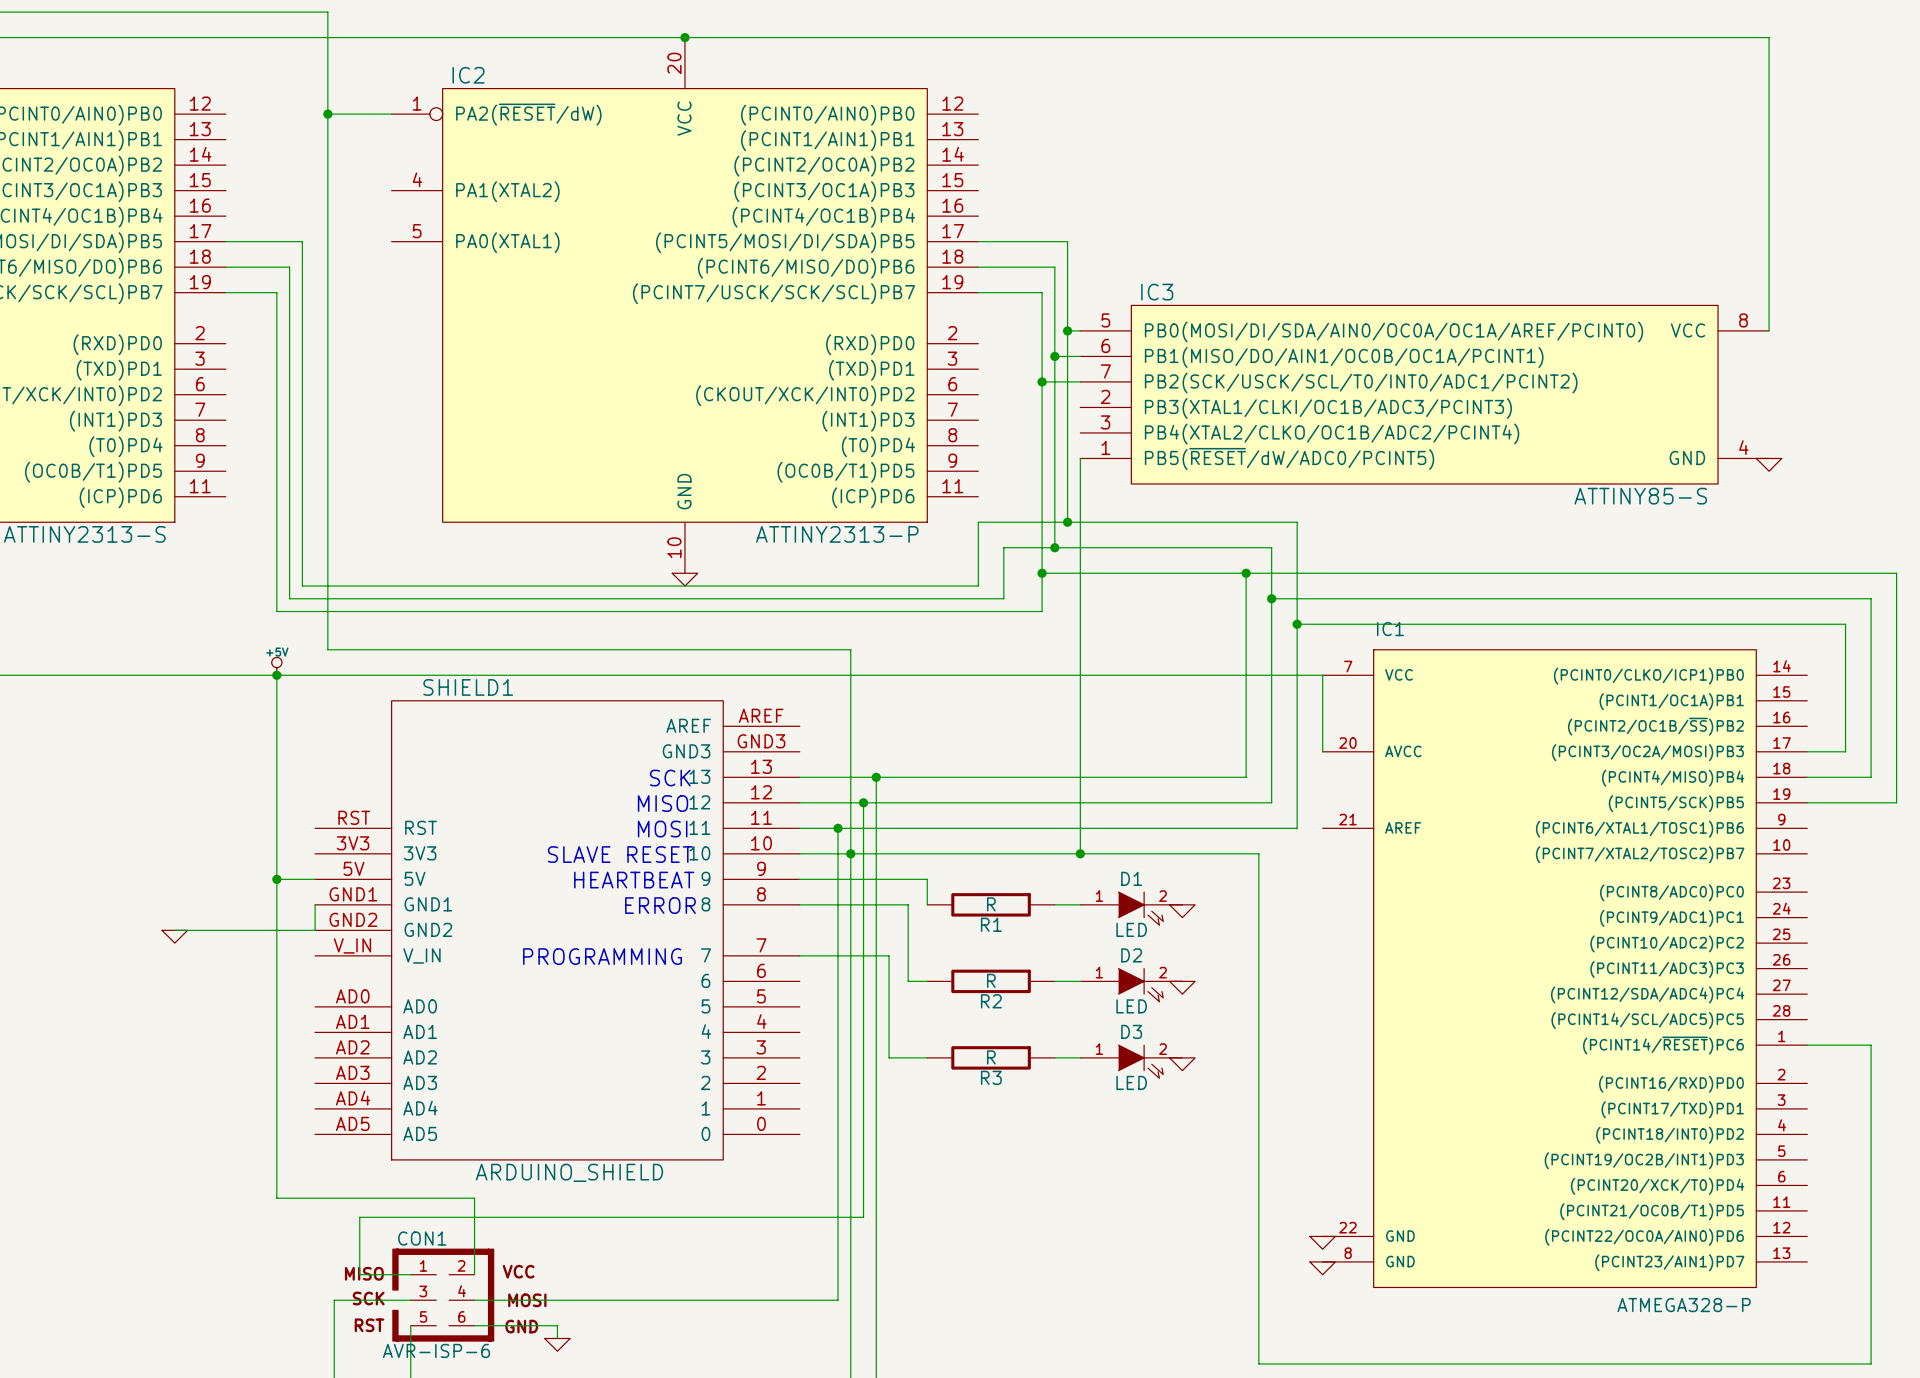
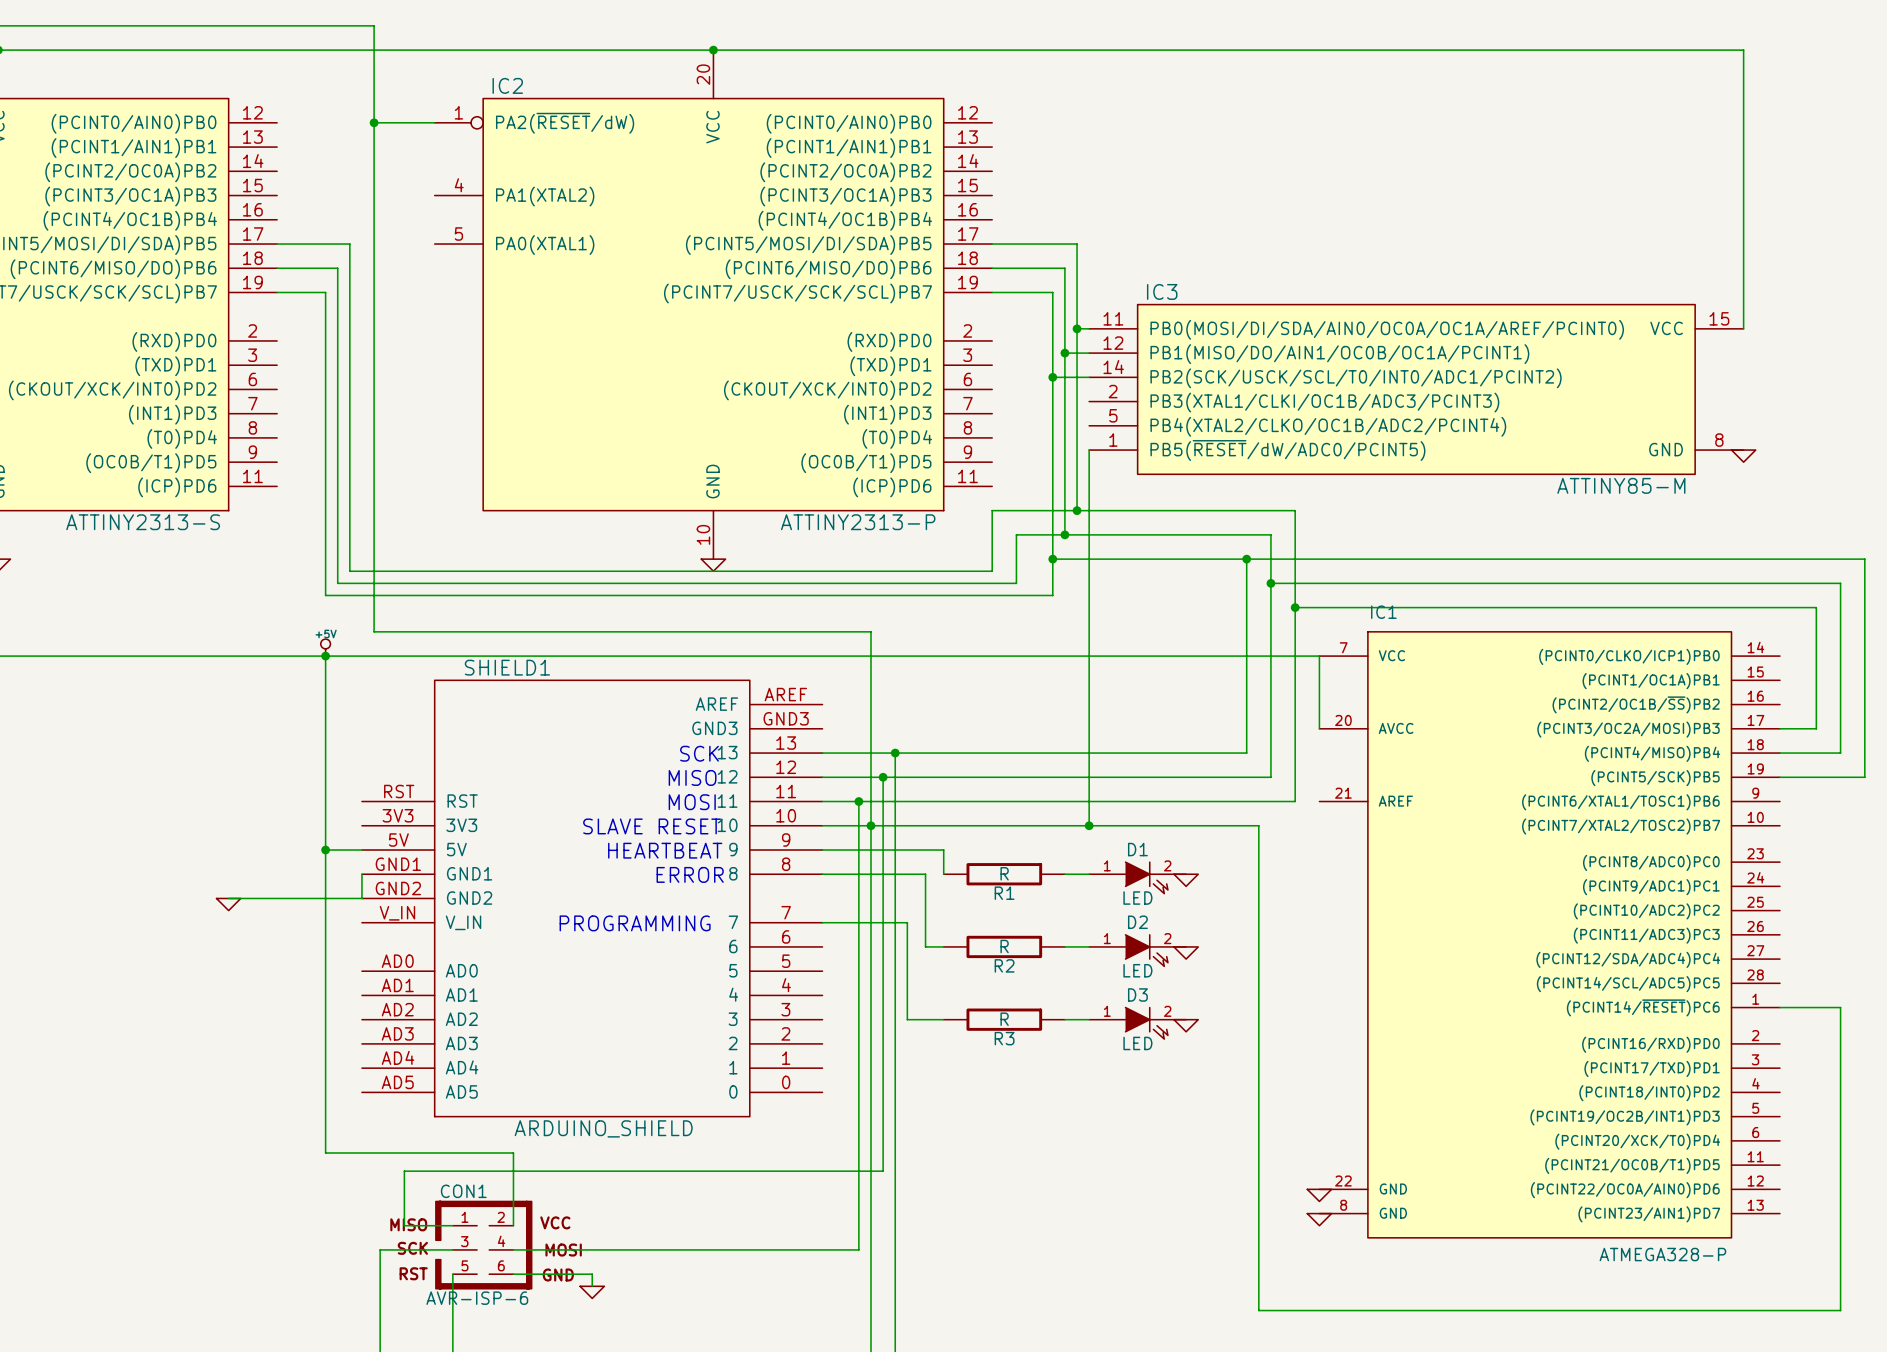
IC3 pin number: 5 (1105, 320) -> 11 (1113, 318)
IC3 pin number: 8 (1743, 320) -> 15 (1719, 318)
IC3 pin number: 6 (1105, 345) -> 12 (1113, 343)
IC3 pin number: 7 (1105, 371) -> 14 (1113, 367)
IC3 pin number: 3 (1105, 422) -> 5 (1113, 415)
IC3 pin number: 4 (1743, 447) -> 8 (1719, 440)
IC3 value: ATTINY85-S (1640, 496) -> ATTINY85-M (1621, 485)

